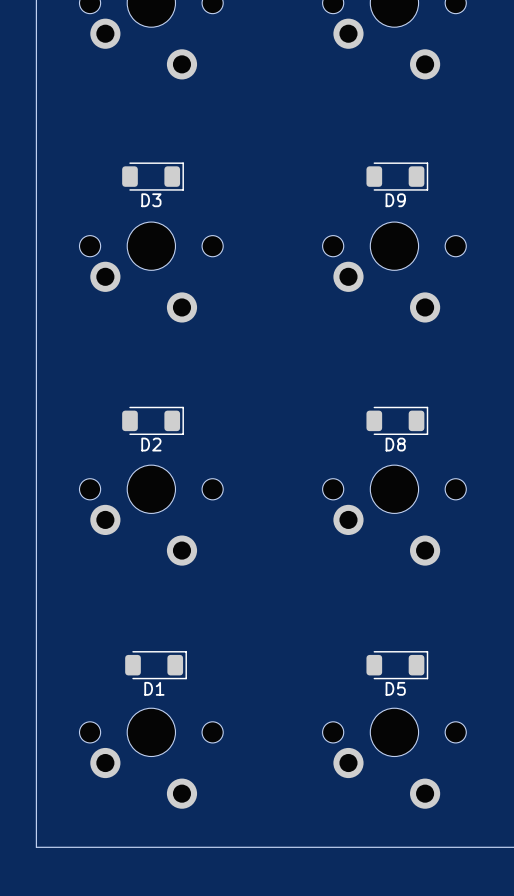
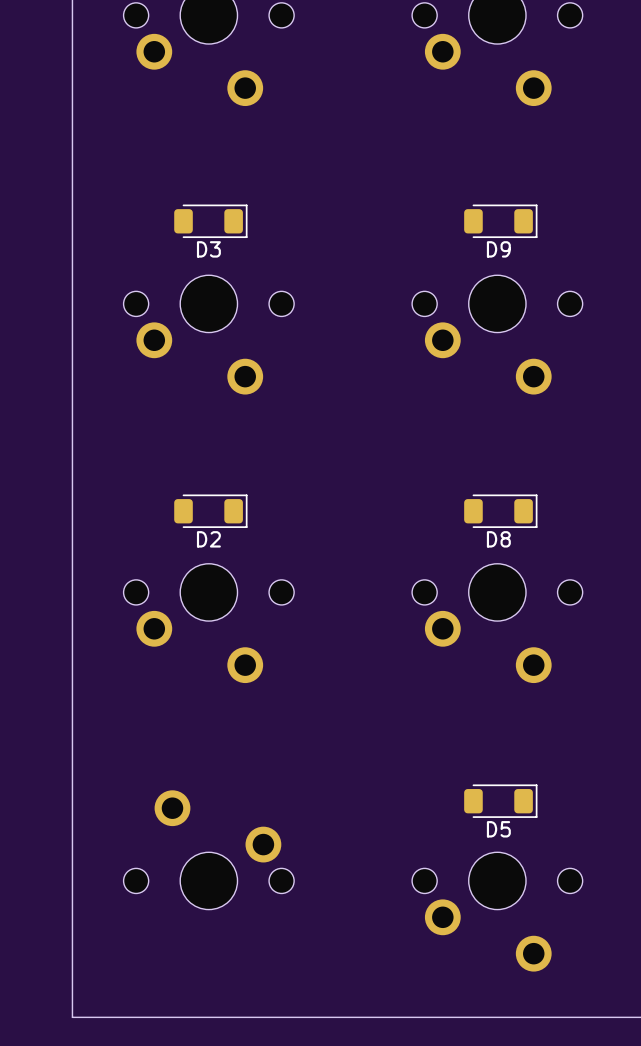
D1: (156, 665) -> none
part rotation: 0° (151, 758) -> 180° (208, 849)

